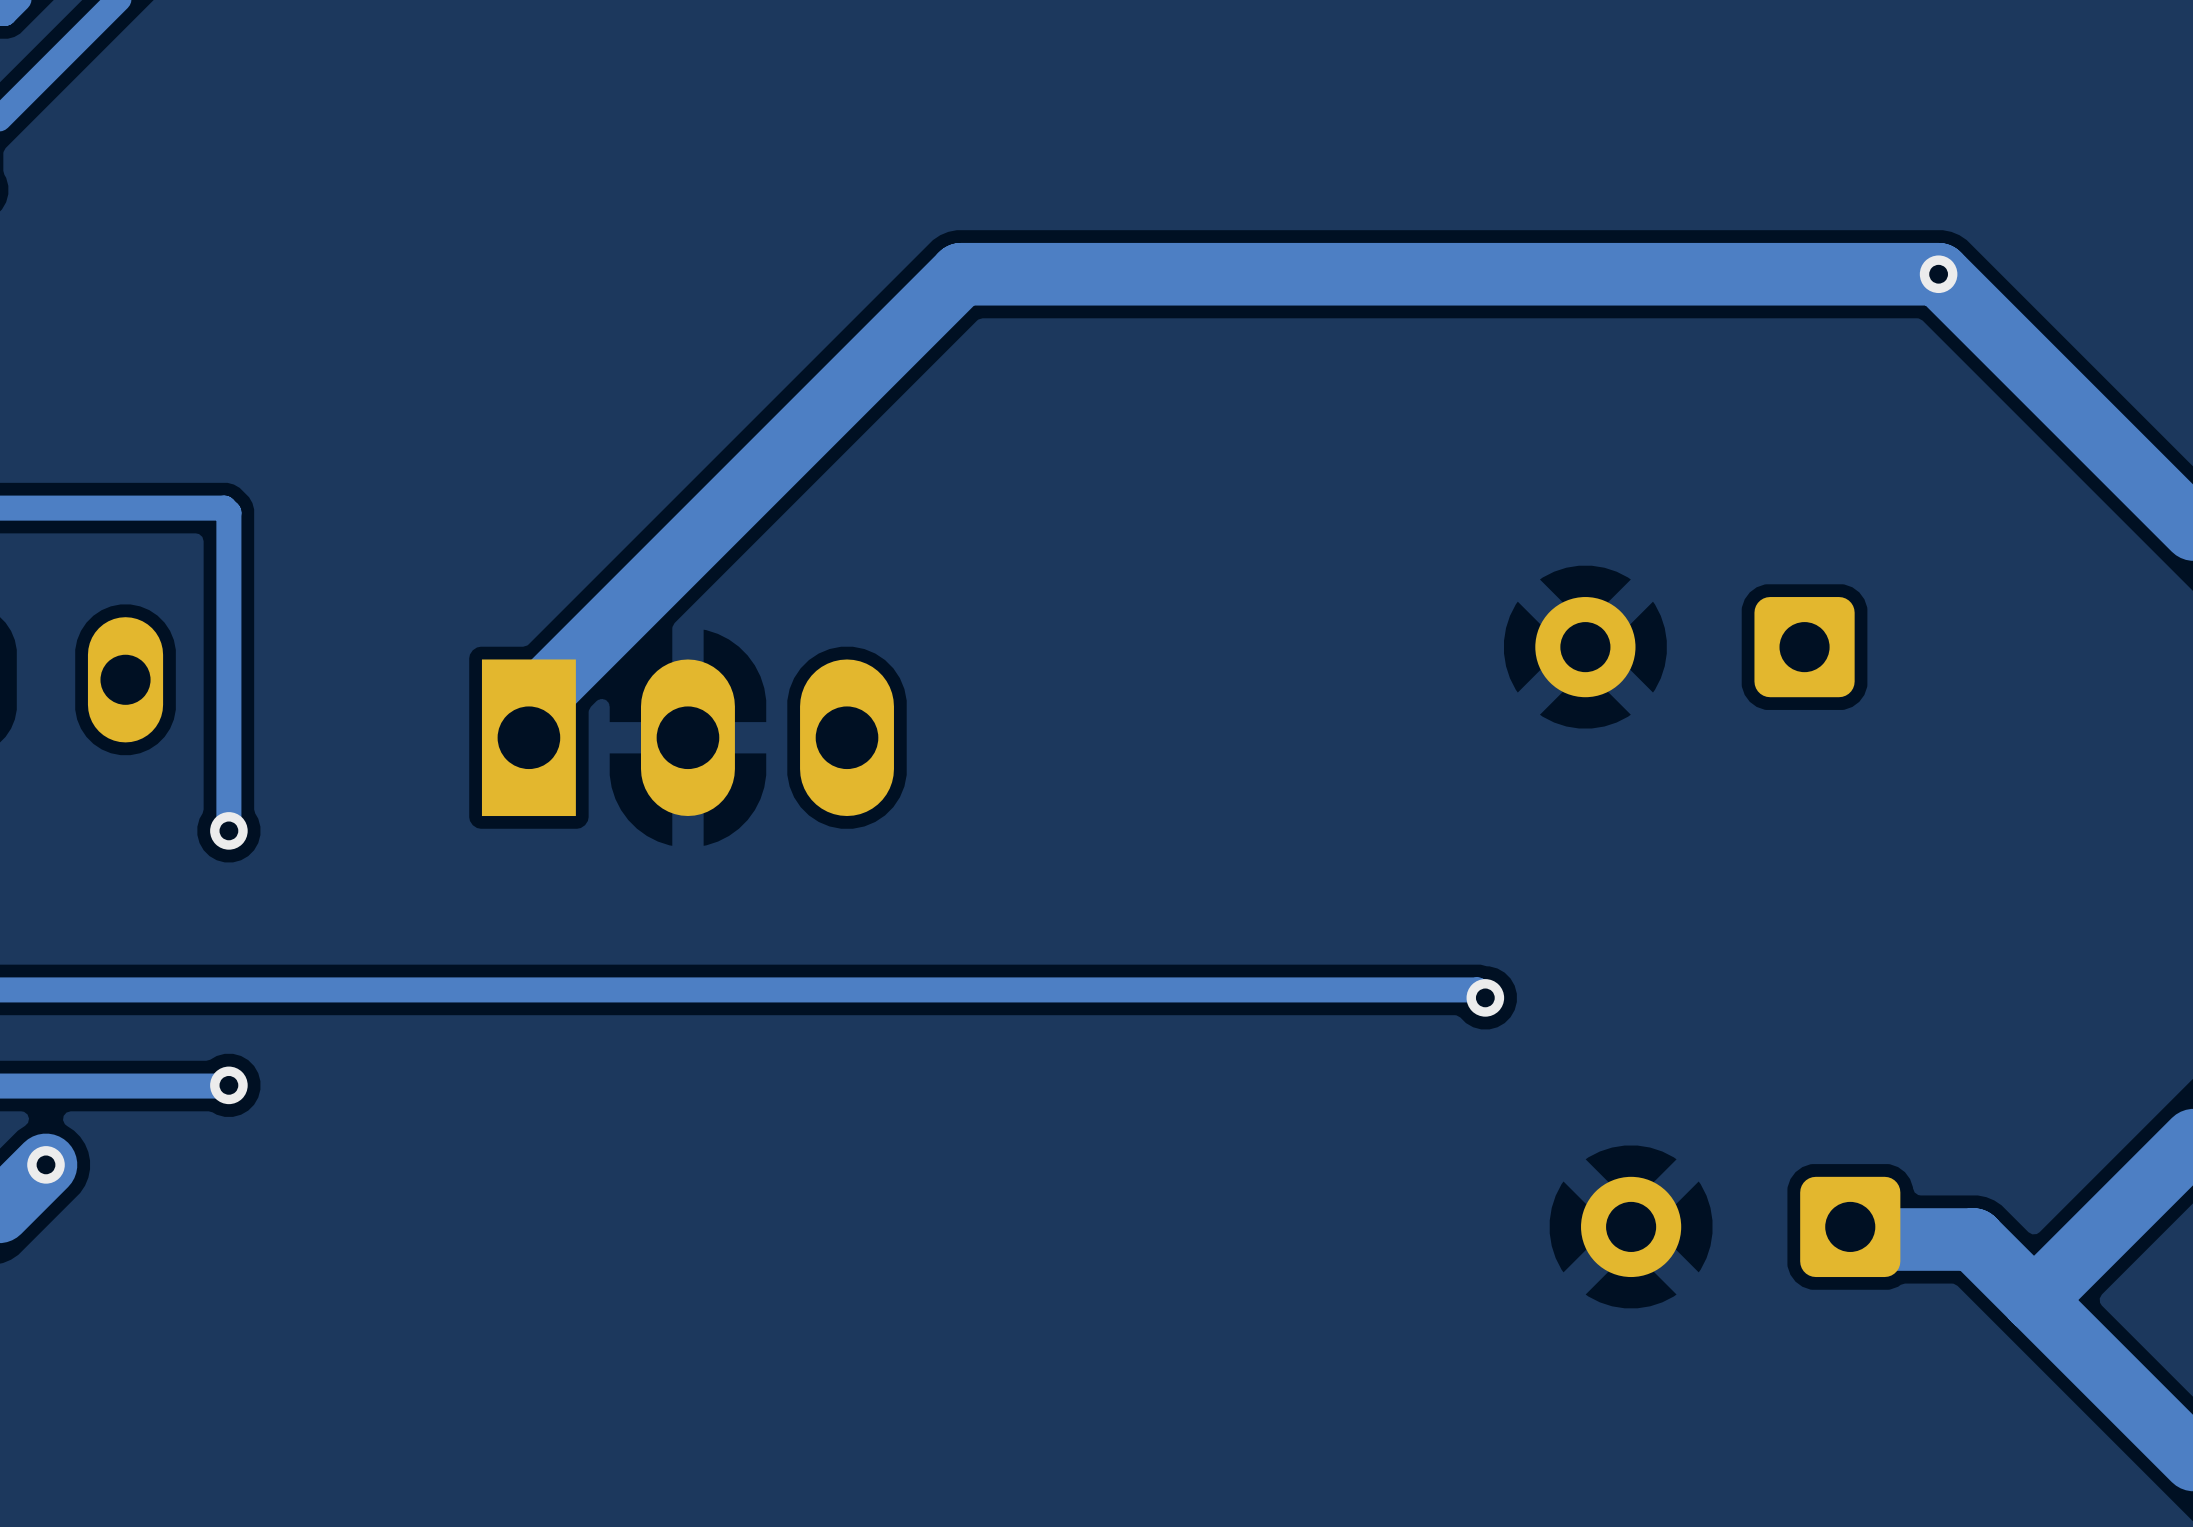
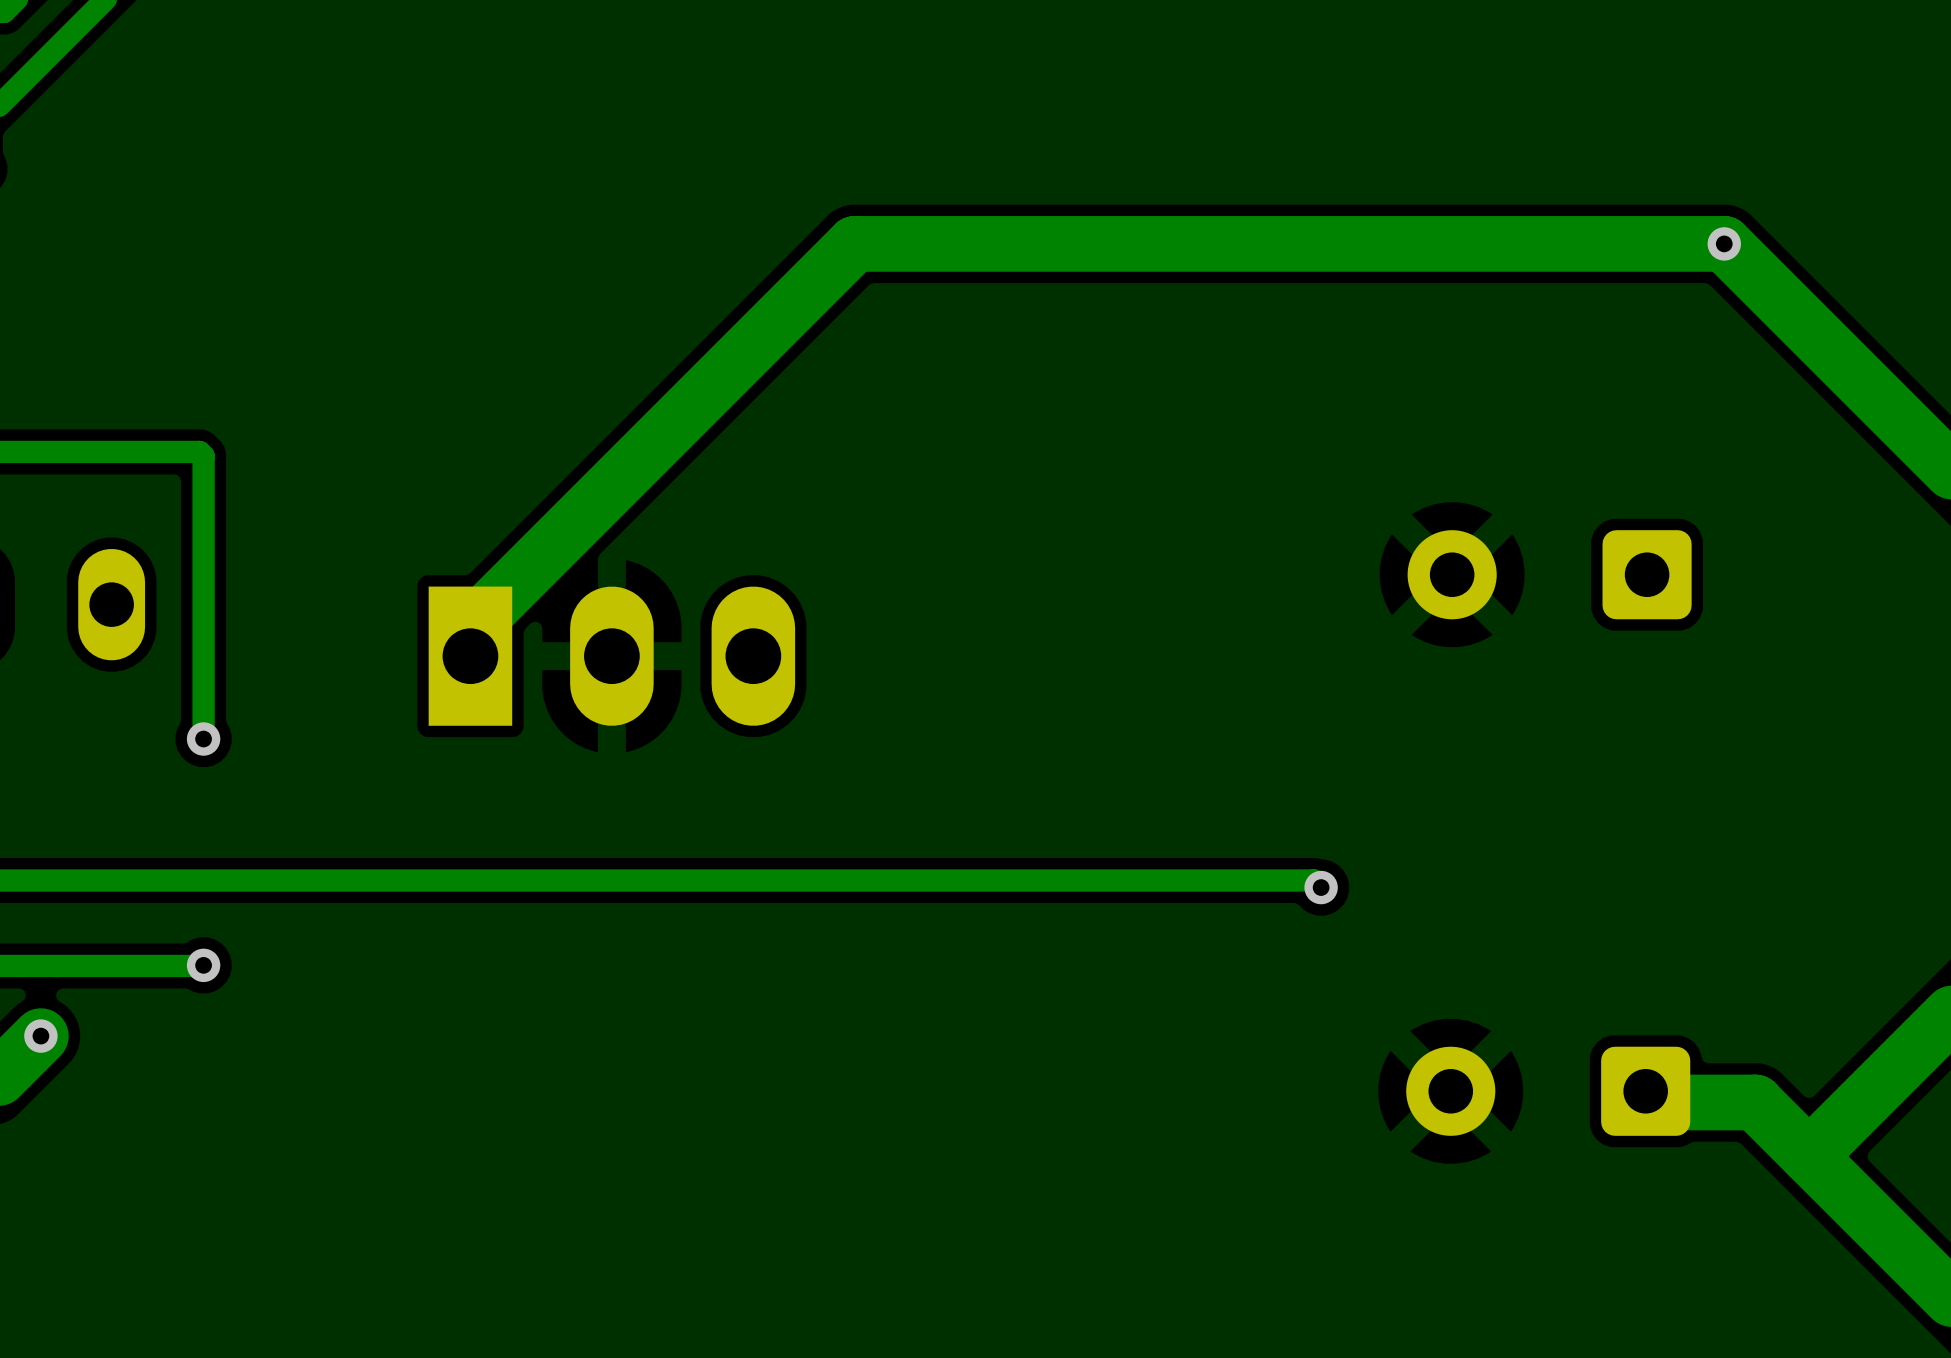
part position: (1694, 647) -> (1549, 574)

